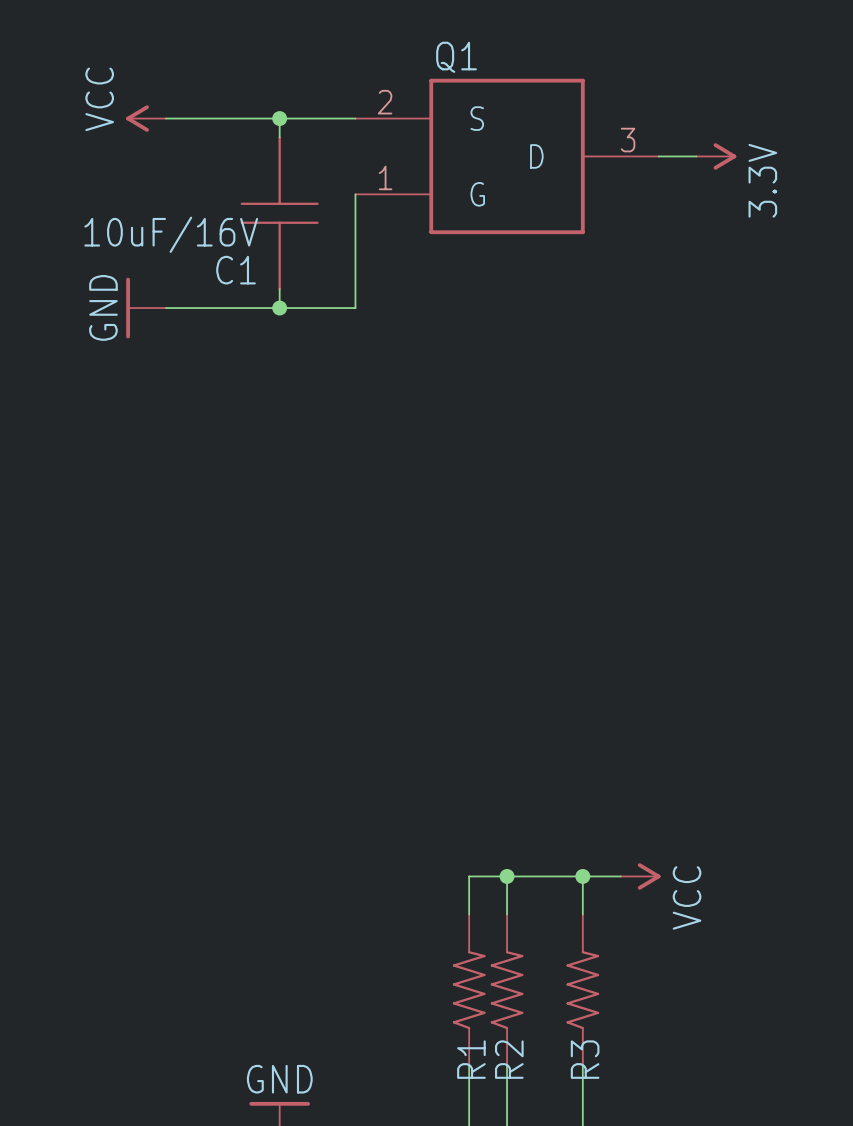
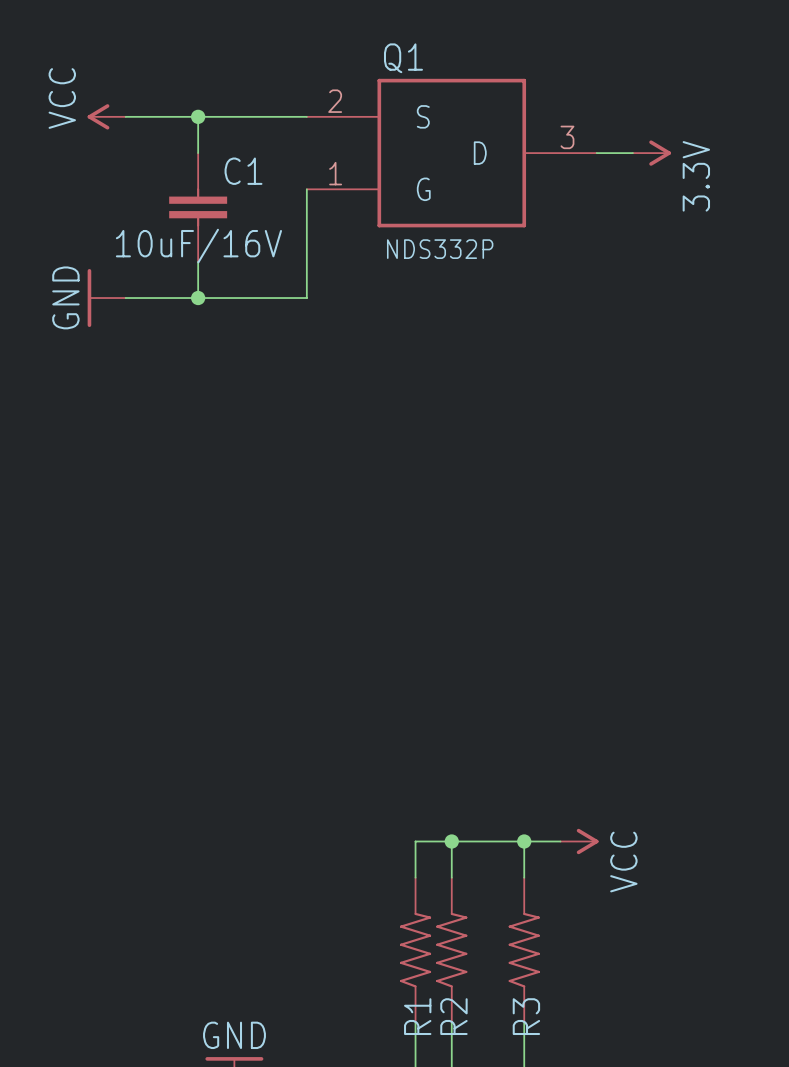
wire: none -> (198, 116) (198, 153)
wire: (279, 118) (279, 137) -> none
junction position: (279, 118) -> (198, 116)
C1 symbol: [240, 136, 319, 291] -> [169, 153, 228, 262]
C1 value position: 10uF/16V (171, 234) -> 10uF/16V (198, 246)
Q1 value: none -> NDS332P (440, 249)
C1 name position: C1 (236, 270) -> C1 (243, 171)
wire: none -> (198, 261) (198, 298)
wire: (279, 289) (279, 308) -> none
junction position: (279, 308) -> (198, 298)

